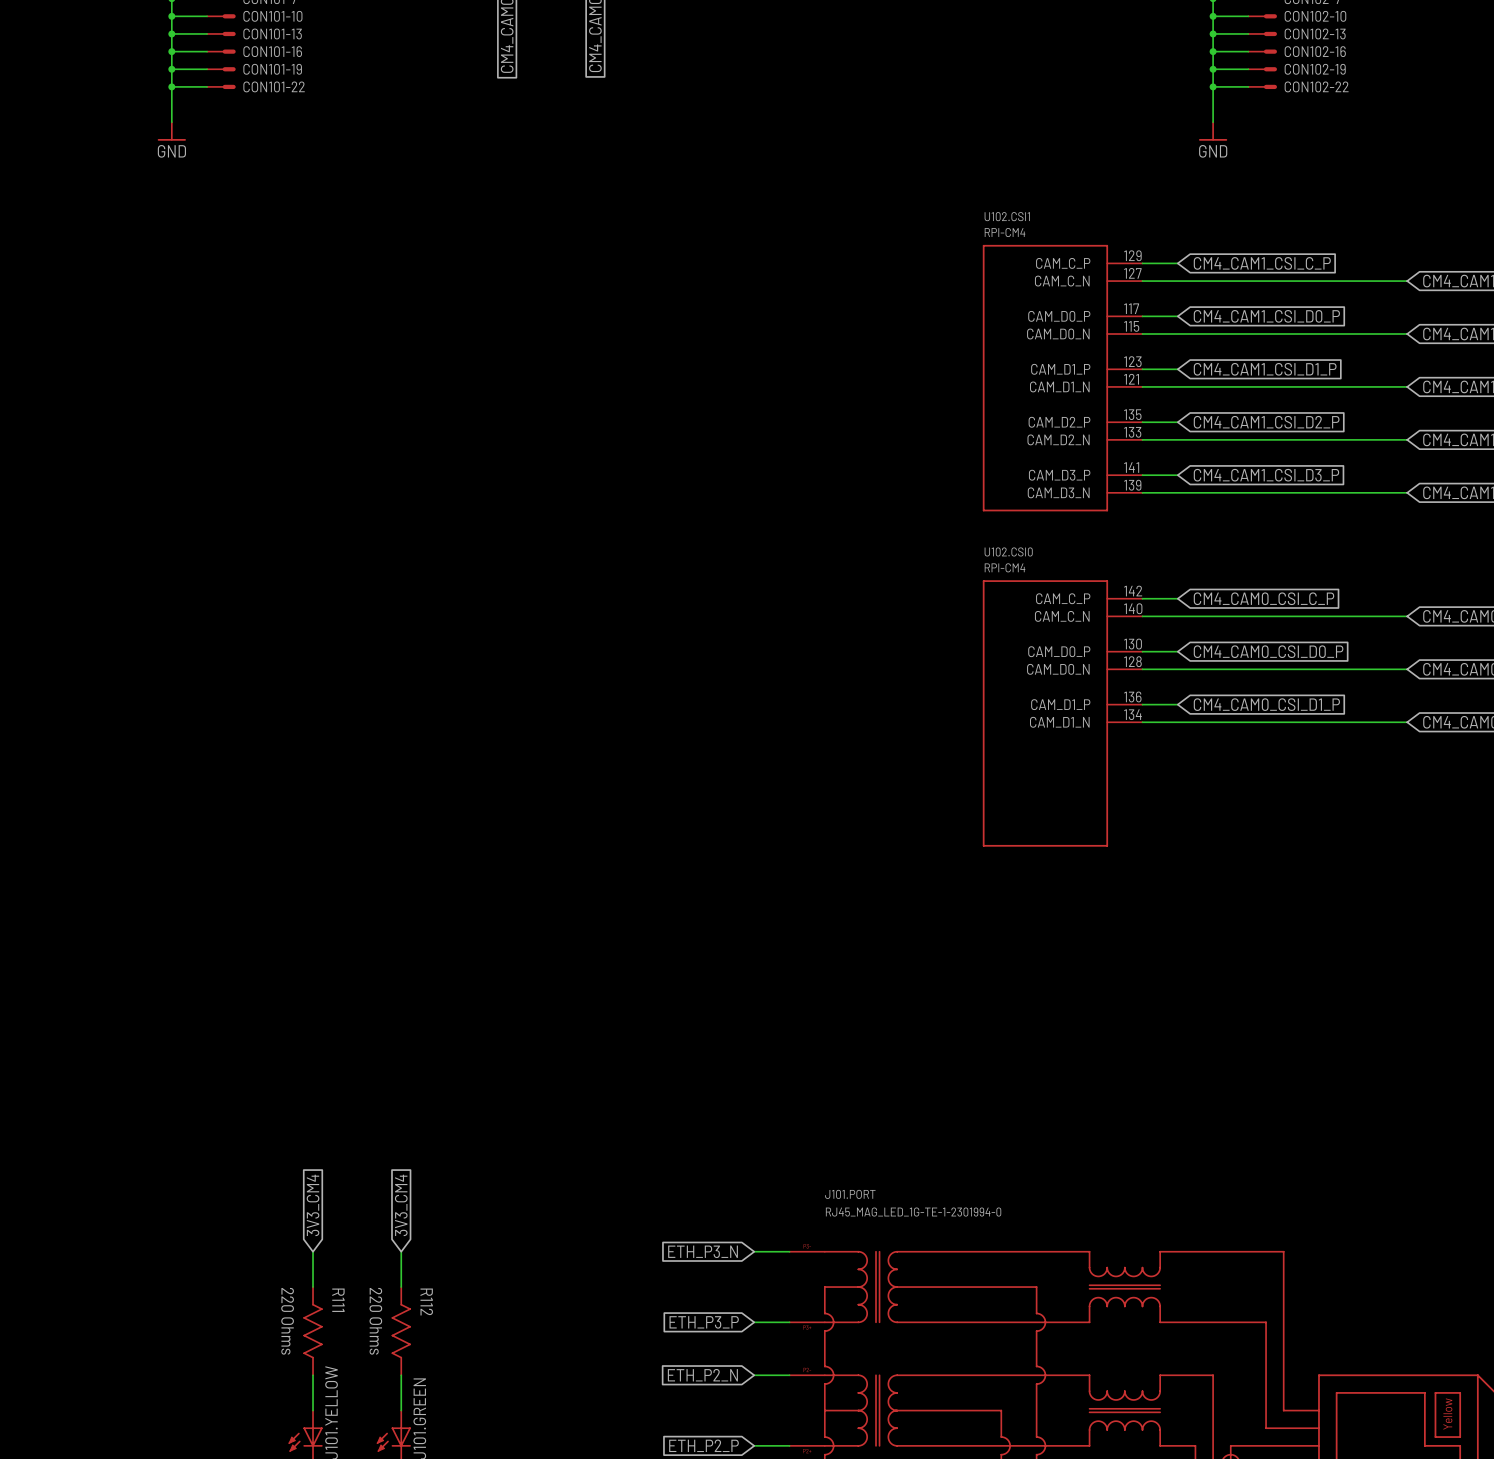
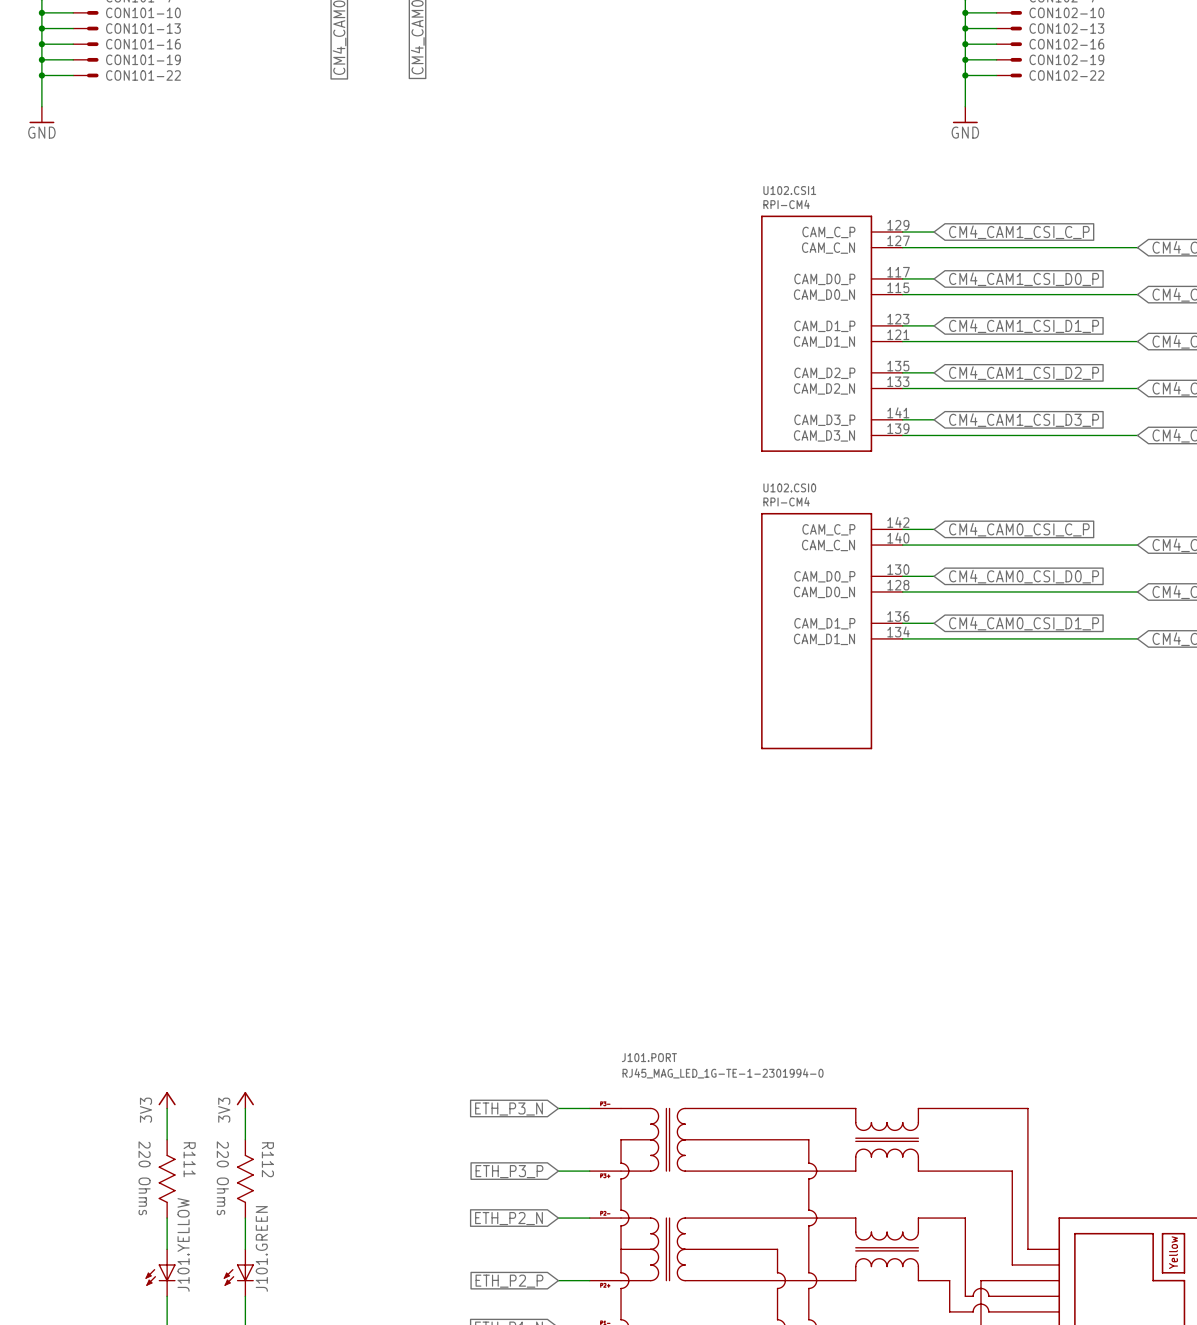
global label: 3V3_CM4 (313, 1205) -> none
global label: 3V3_CM4 (401, 1205) -> none
power symbol: none -> 3V3 (167, 1100)
power symbol: none -> 3V3 (245, 1100)

